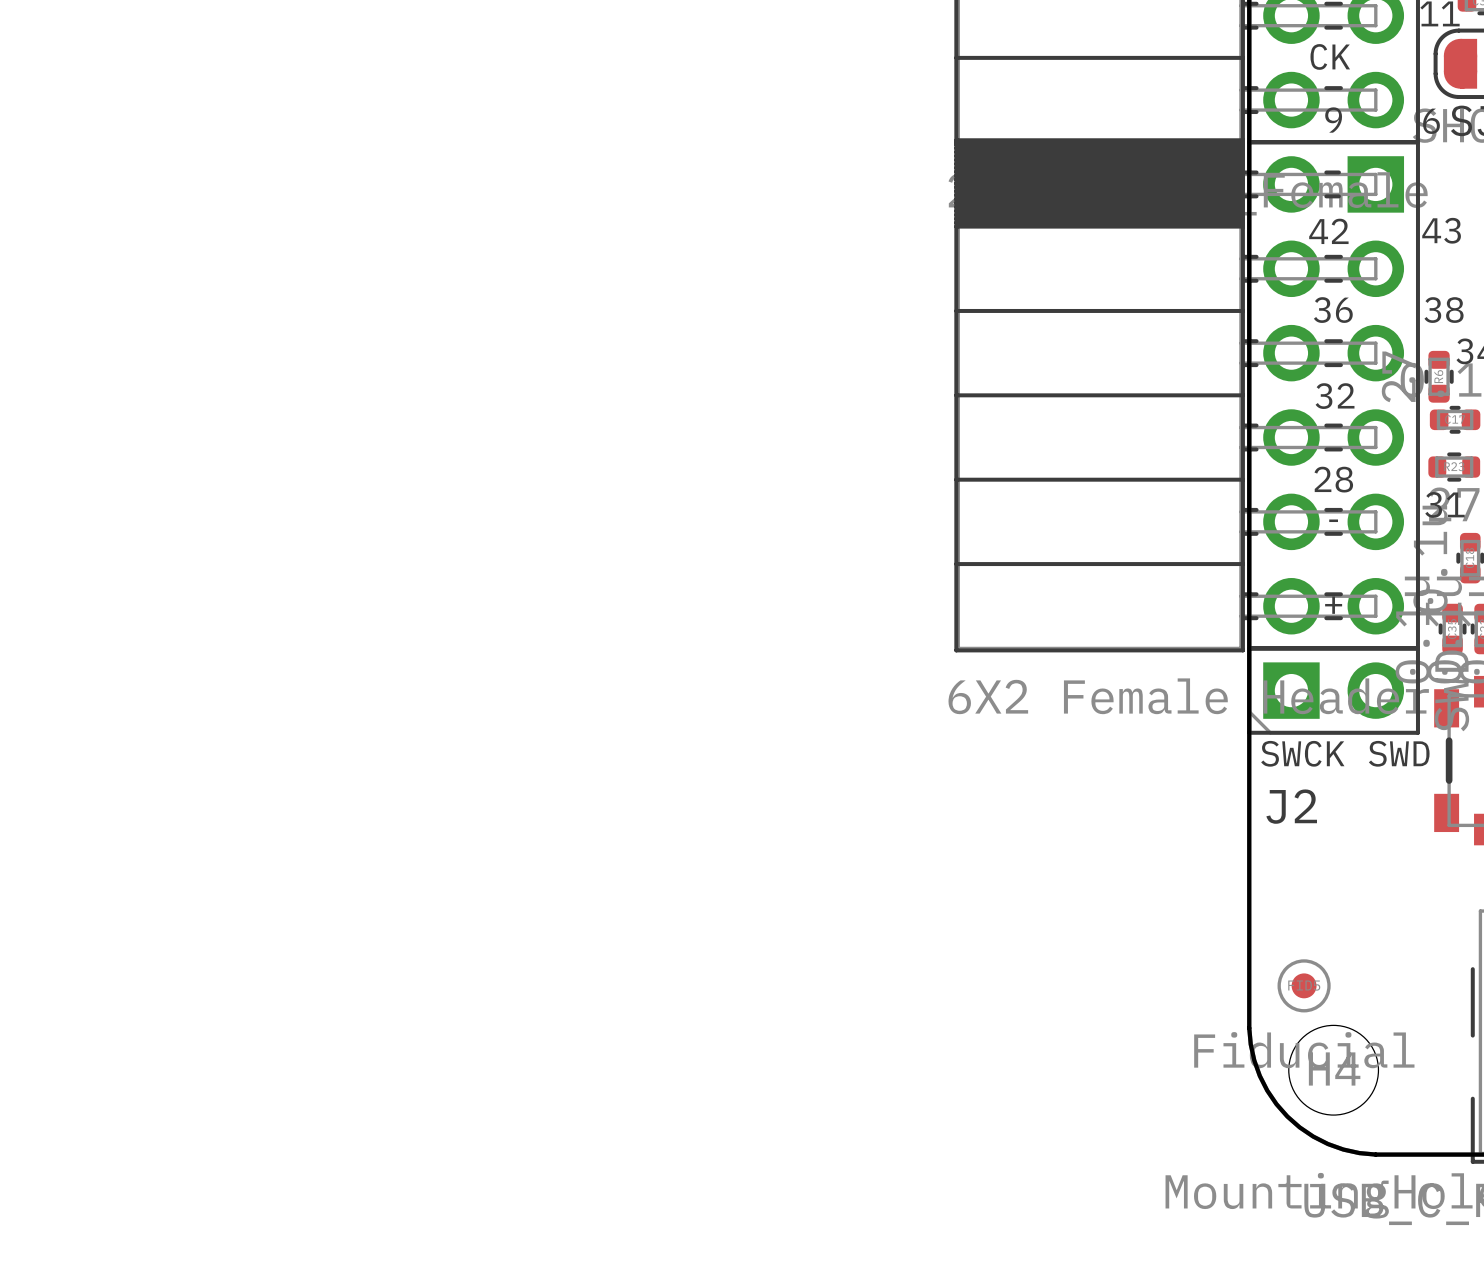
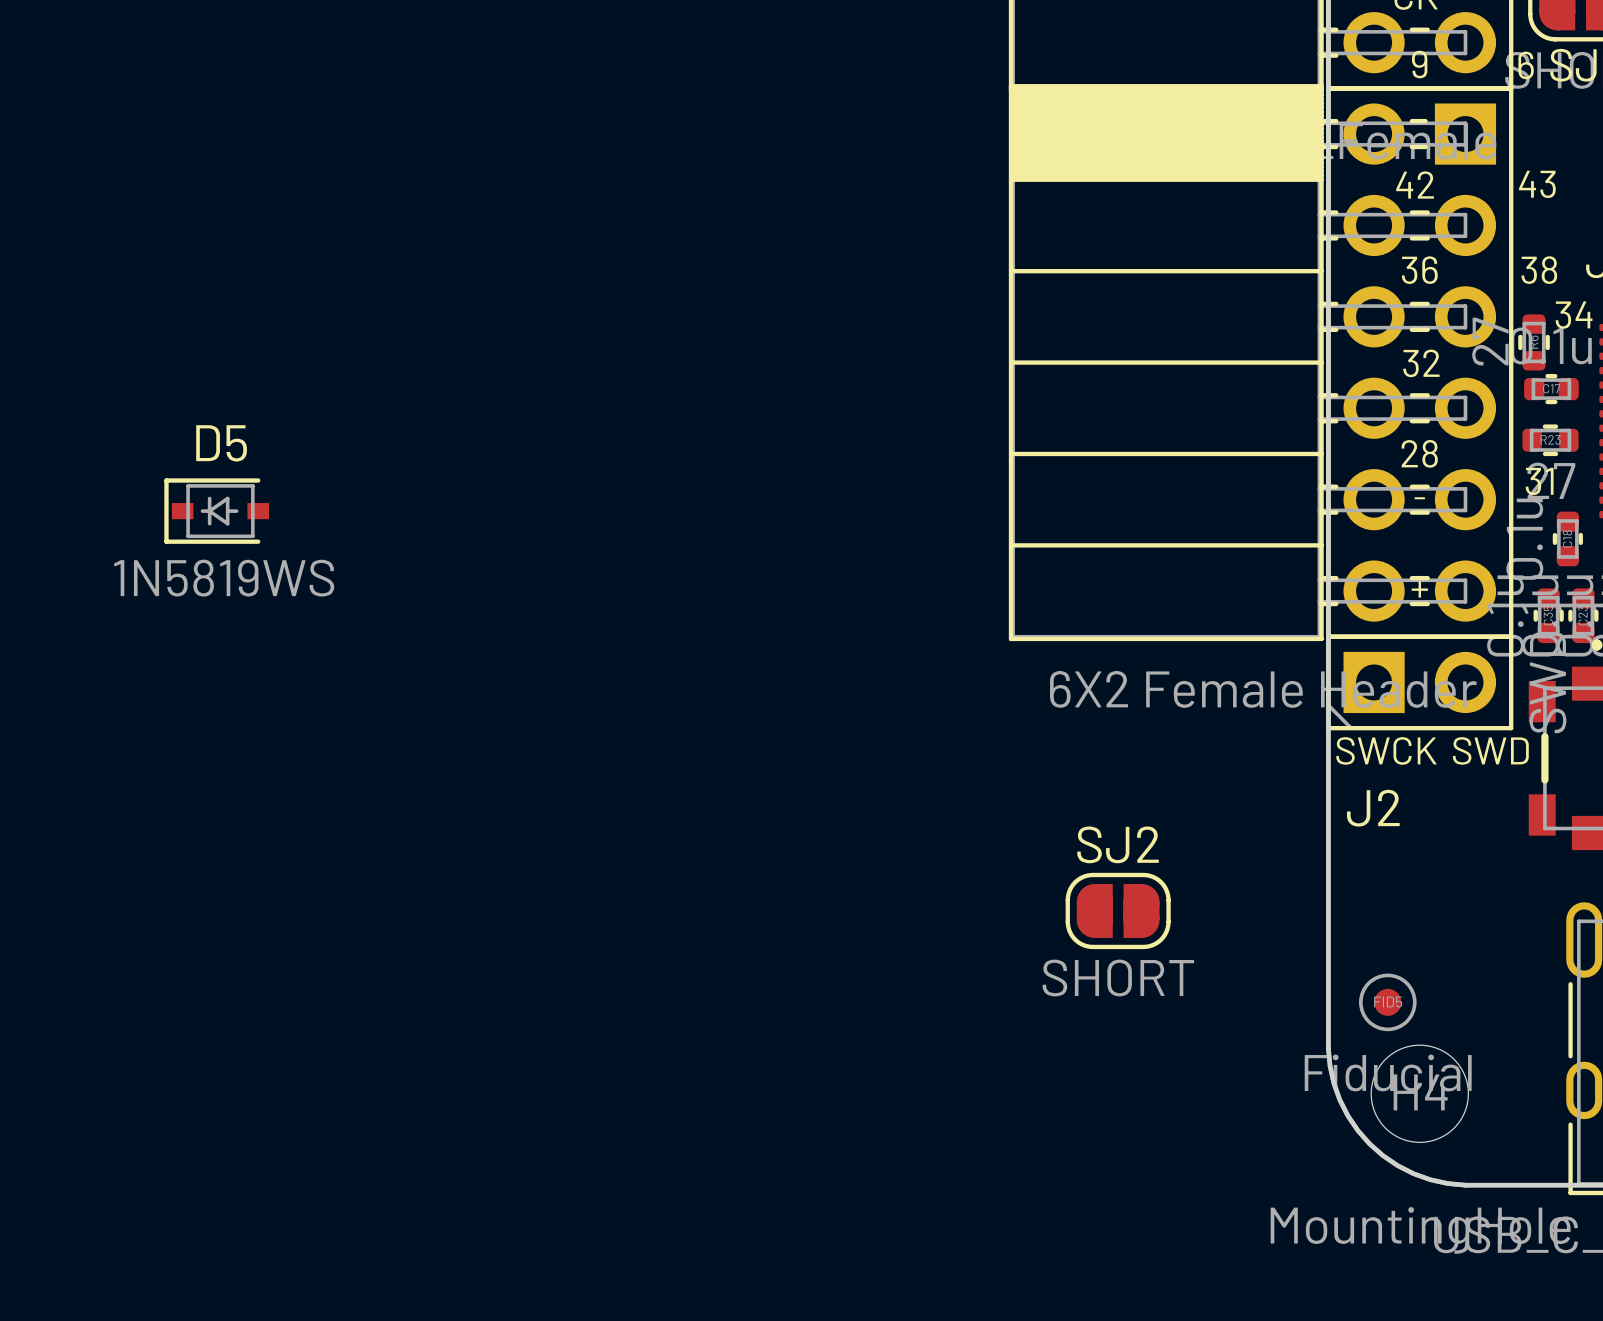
D5: none -> 1N5819WS (216, 511)
SJ2: none -> SHORT (1118, 910)

